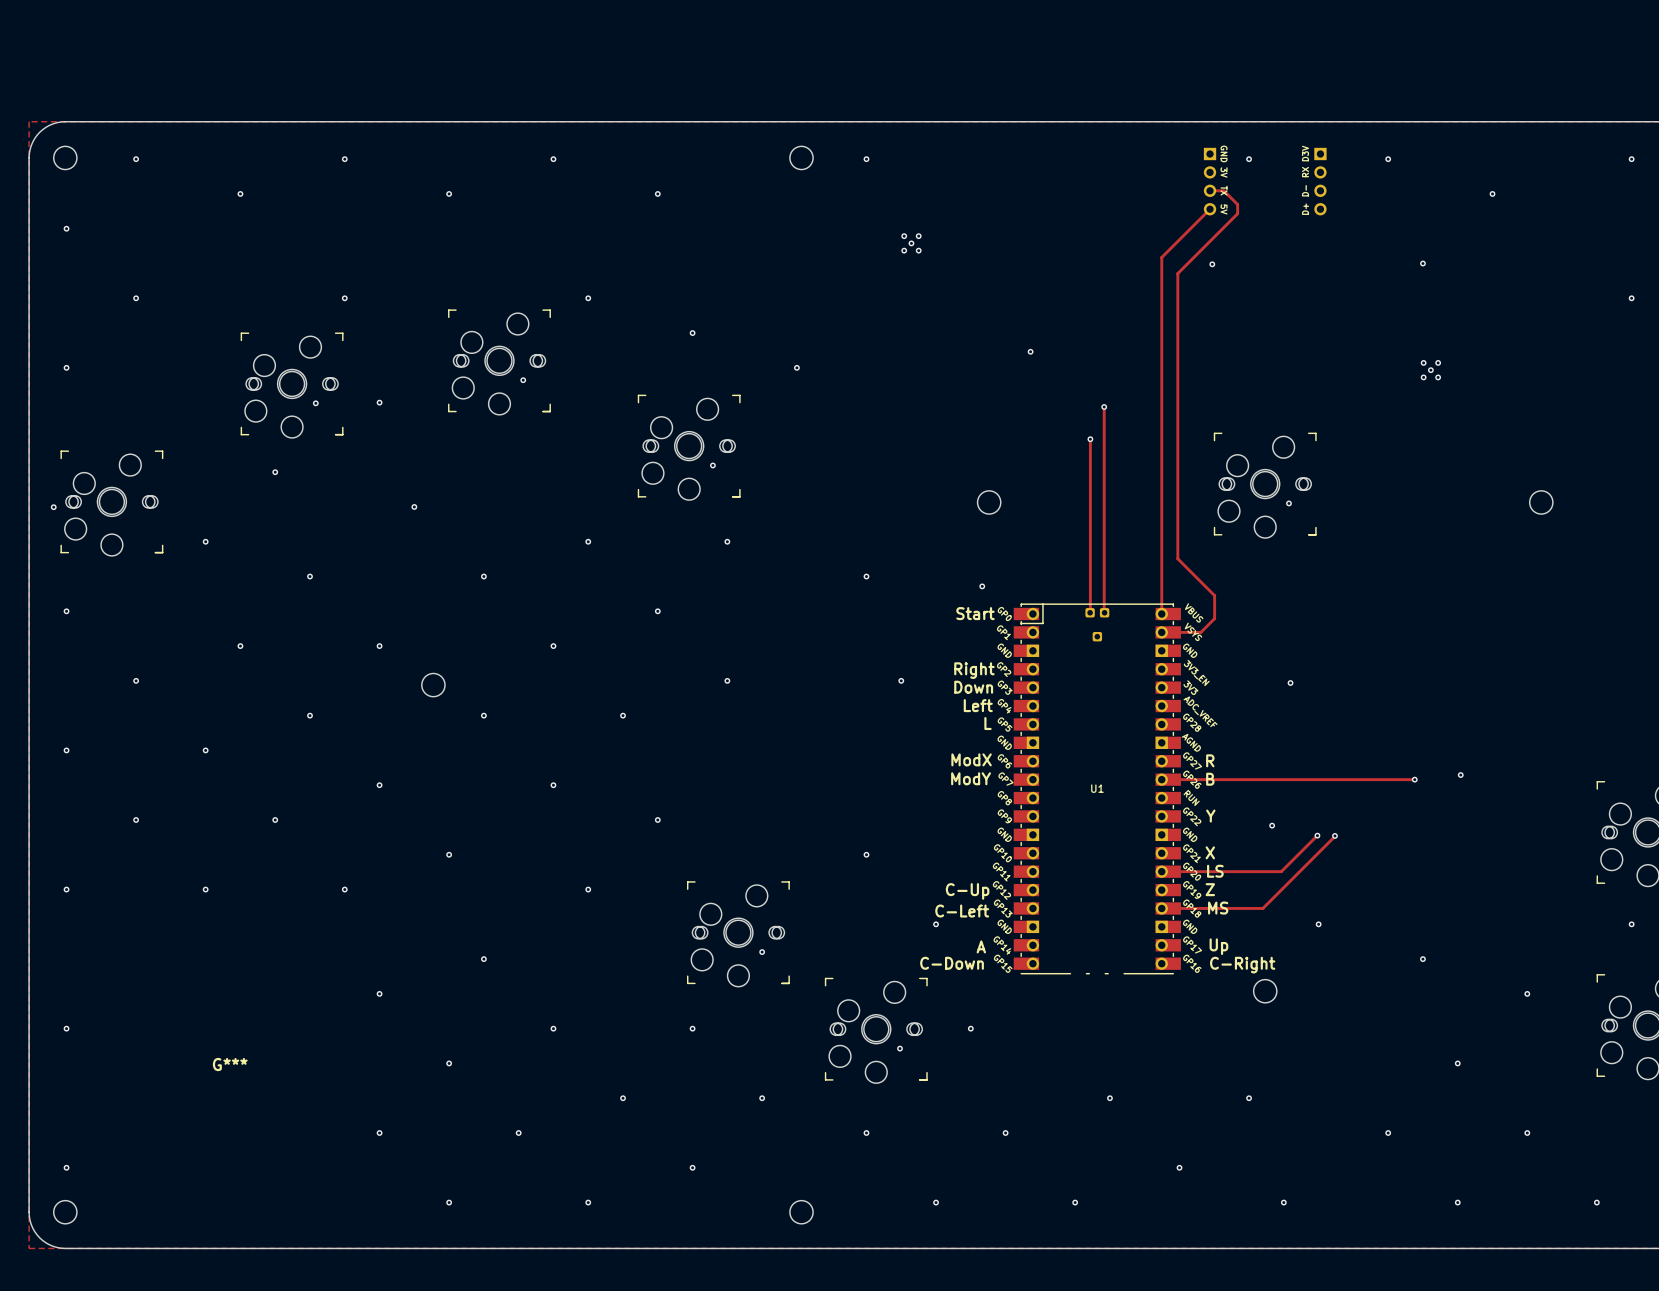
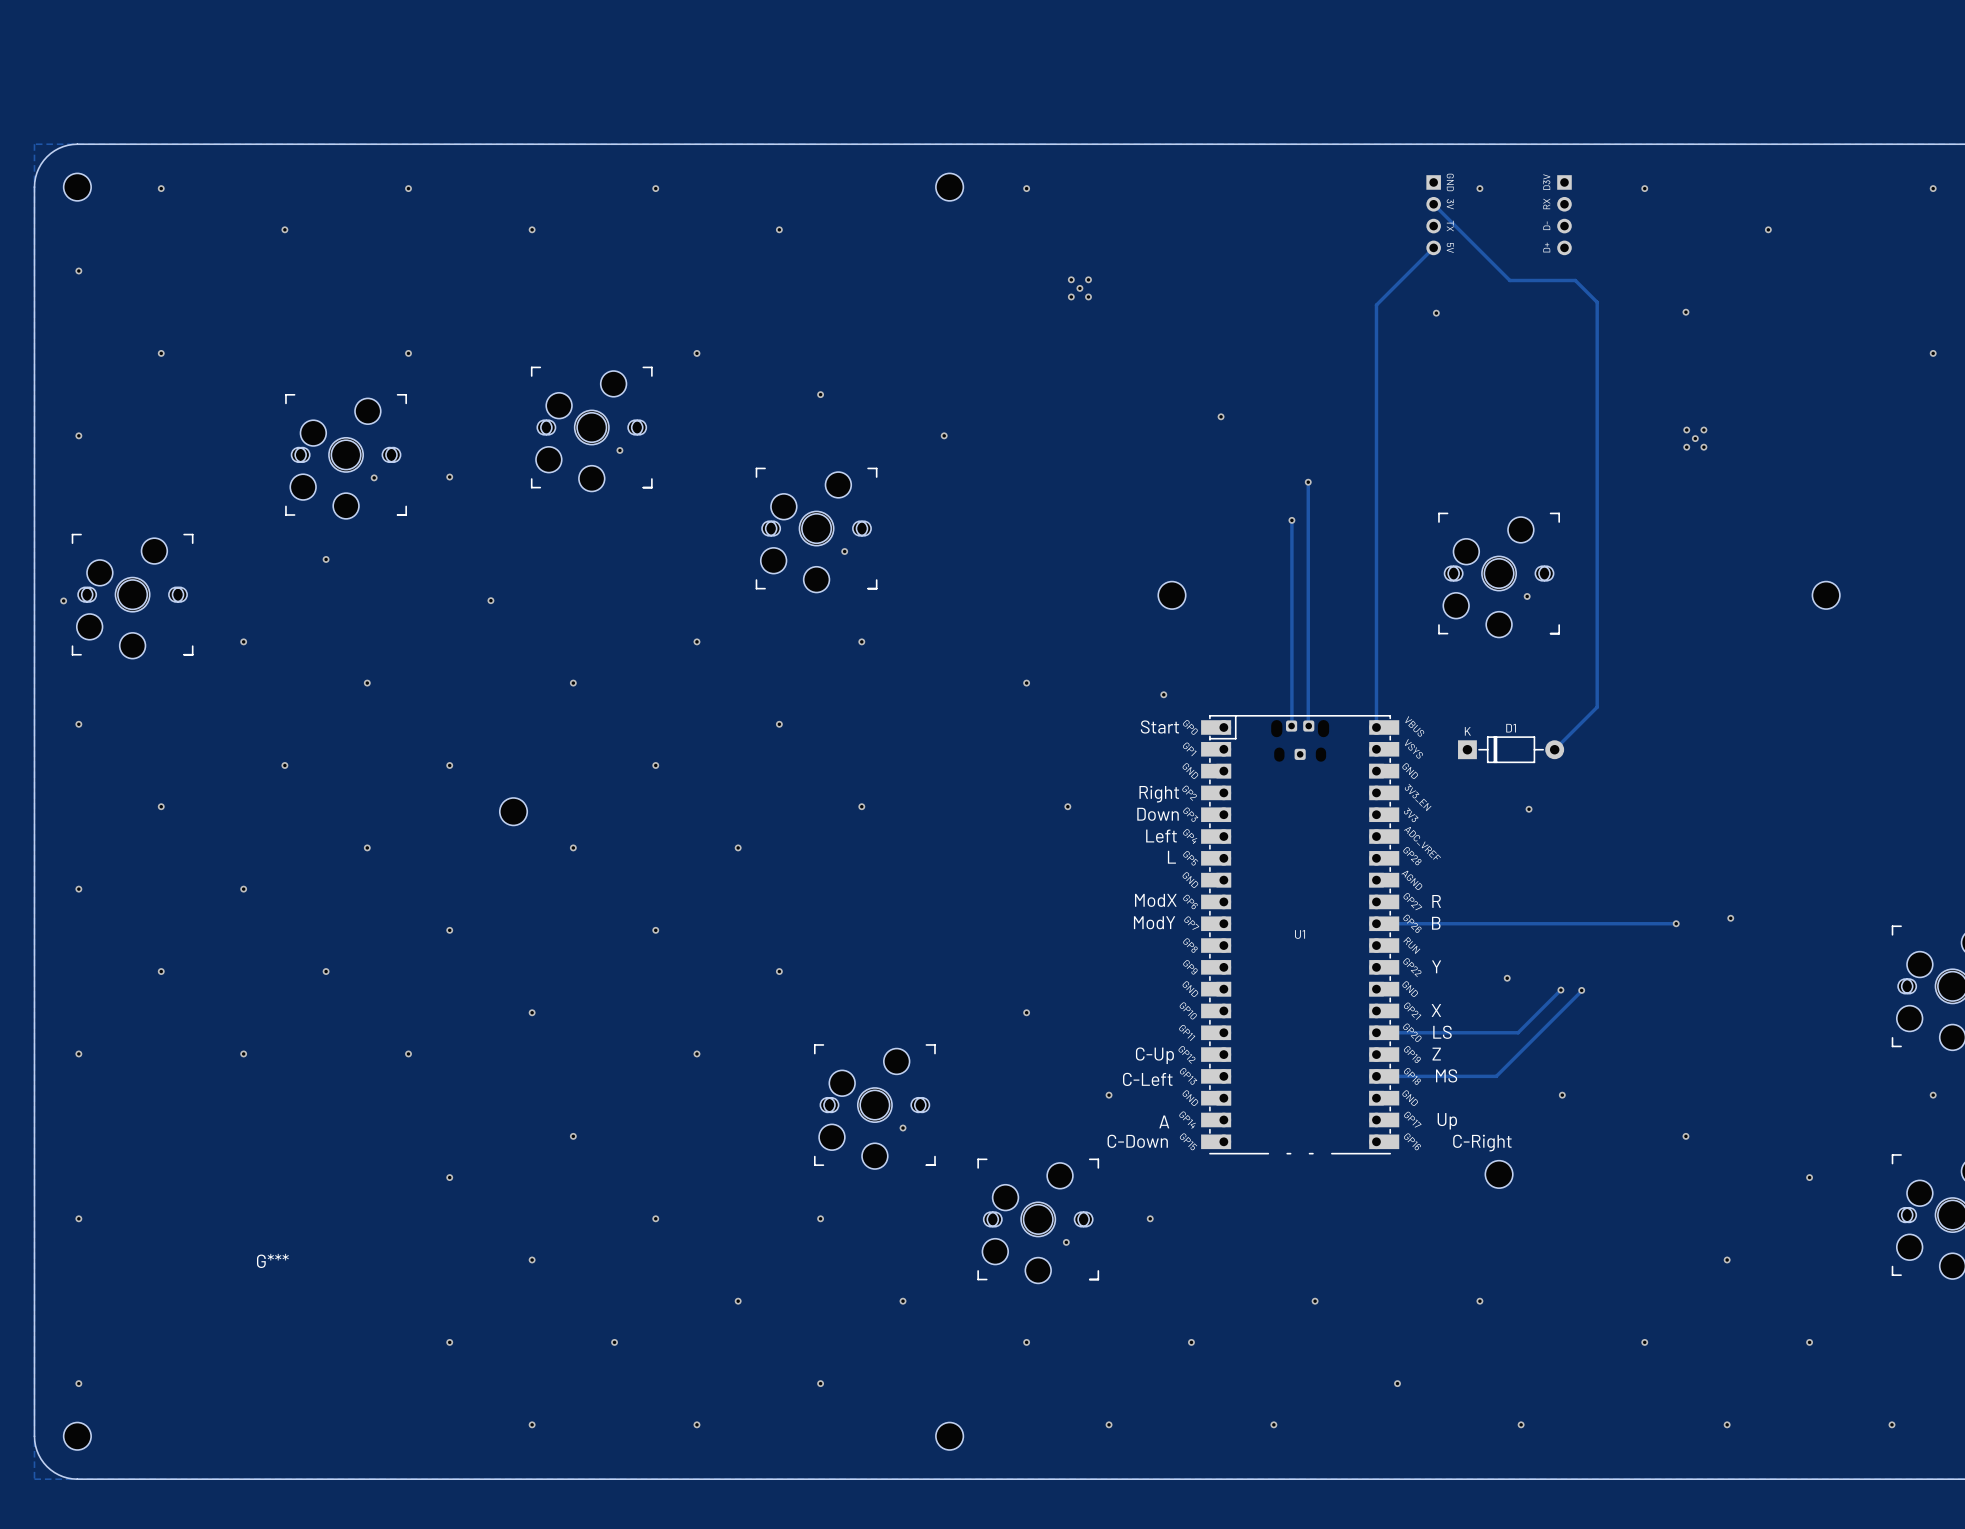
track: none -> (1433, 204) (1509, 280) (1575, 280) (1597, 302) (1597, 707) (1554, 749)
track: (1210, 190) (1223, 190) (1237, 204) (1237, 213) (1177, 273) (1177, 558) (1214, 595) (1214, 618) (1200, 632) (1161, 632) -> none
D1: none -> (1511, 749)

